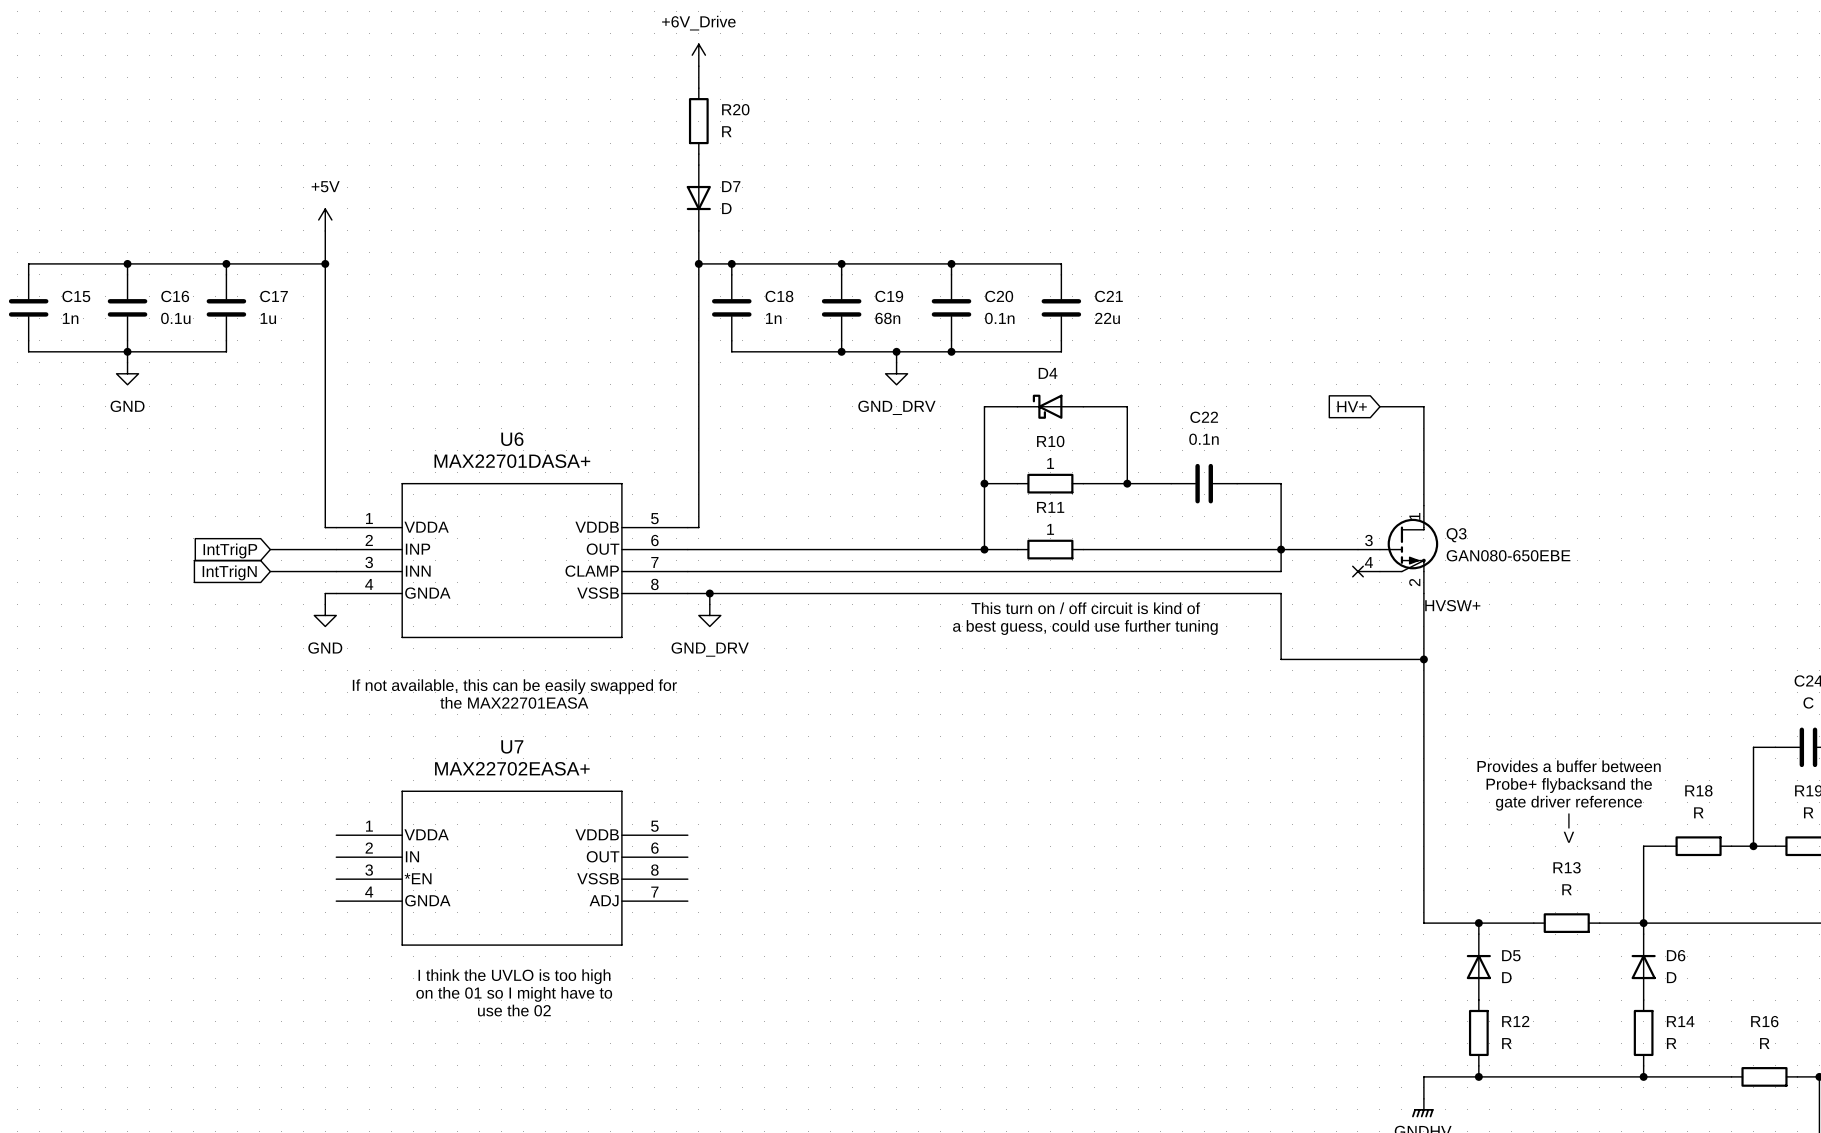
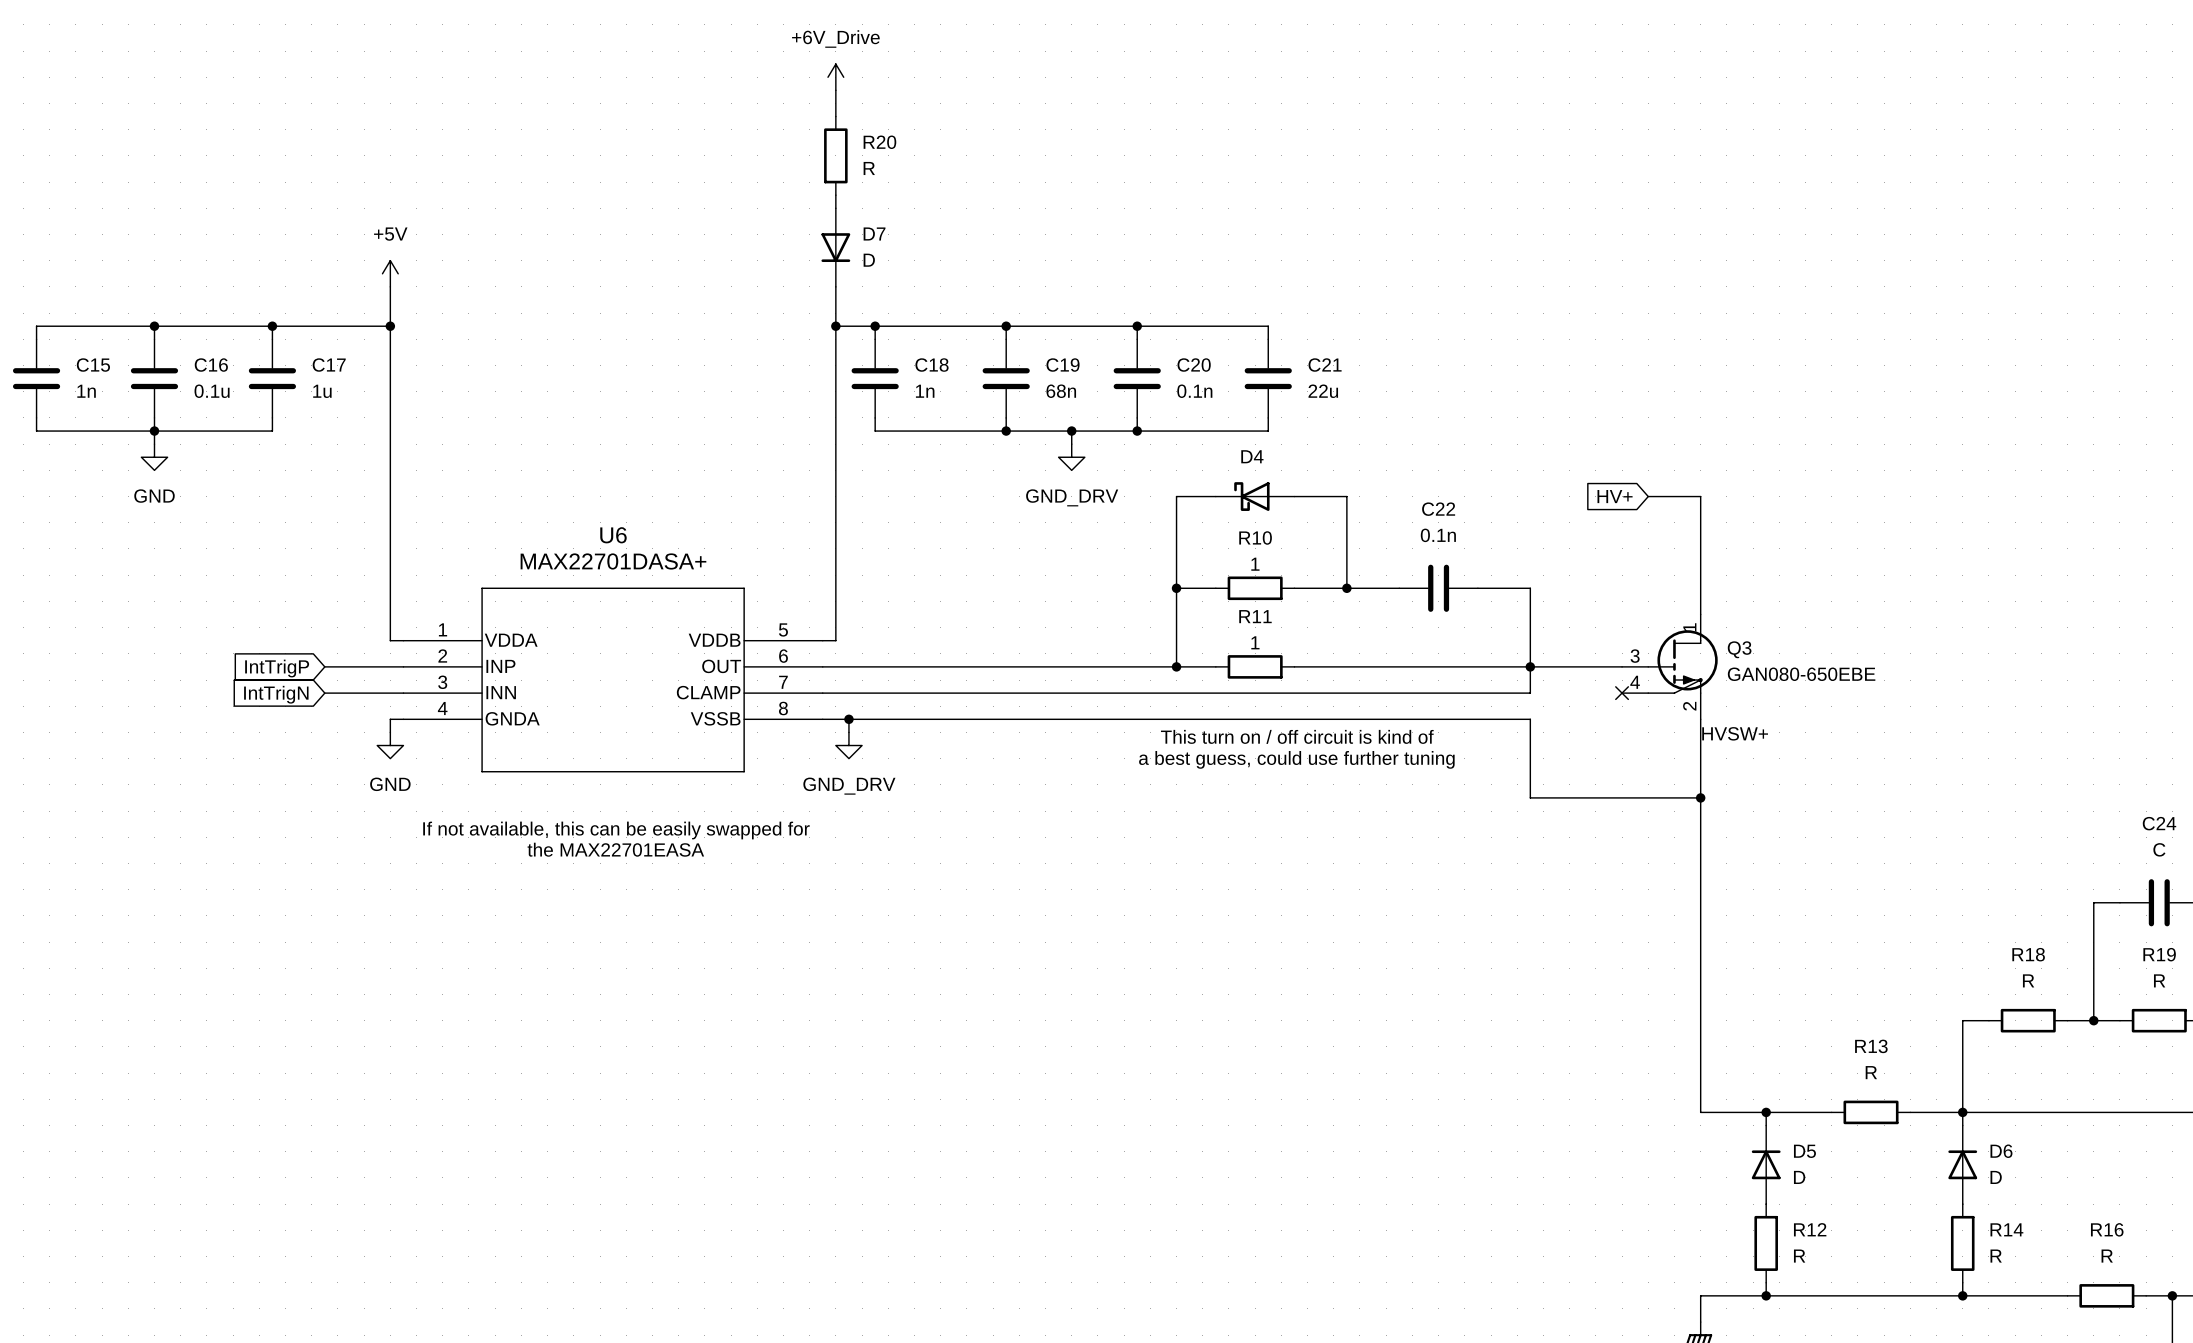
text: Provides a buffer between (1569, 766) -> none
text: Probe+ flybacksand the (1569, 785) -> none
text: gate driver reference (1568, 803) -> none
text: | (1568, 820) -> none
text: V (1568, 837) -> none
U7: MAX22702EASA+ (512, 868) -> none
text: I think the UVLO is too high (514, 976) -> none
text: on the 01 so I might have to (514, 994) -> none
text: use the 02 (514, 1010) -> none

